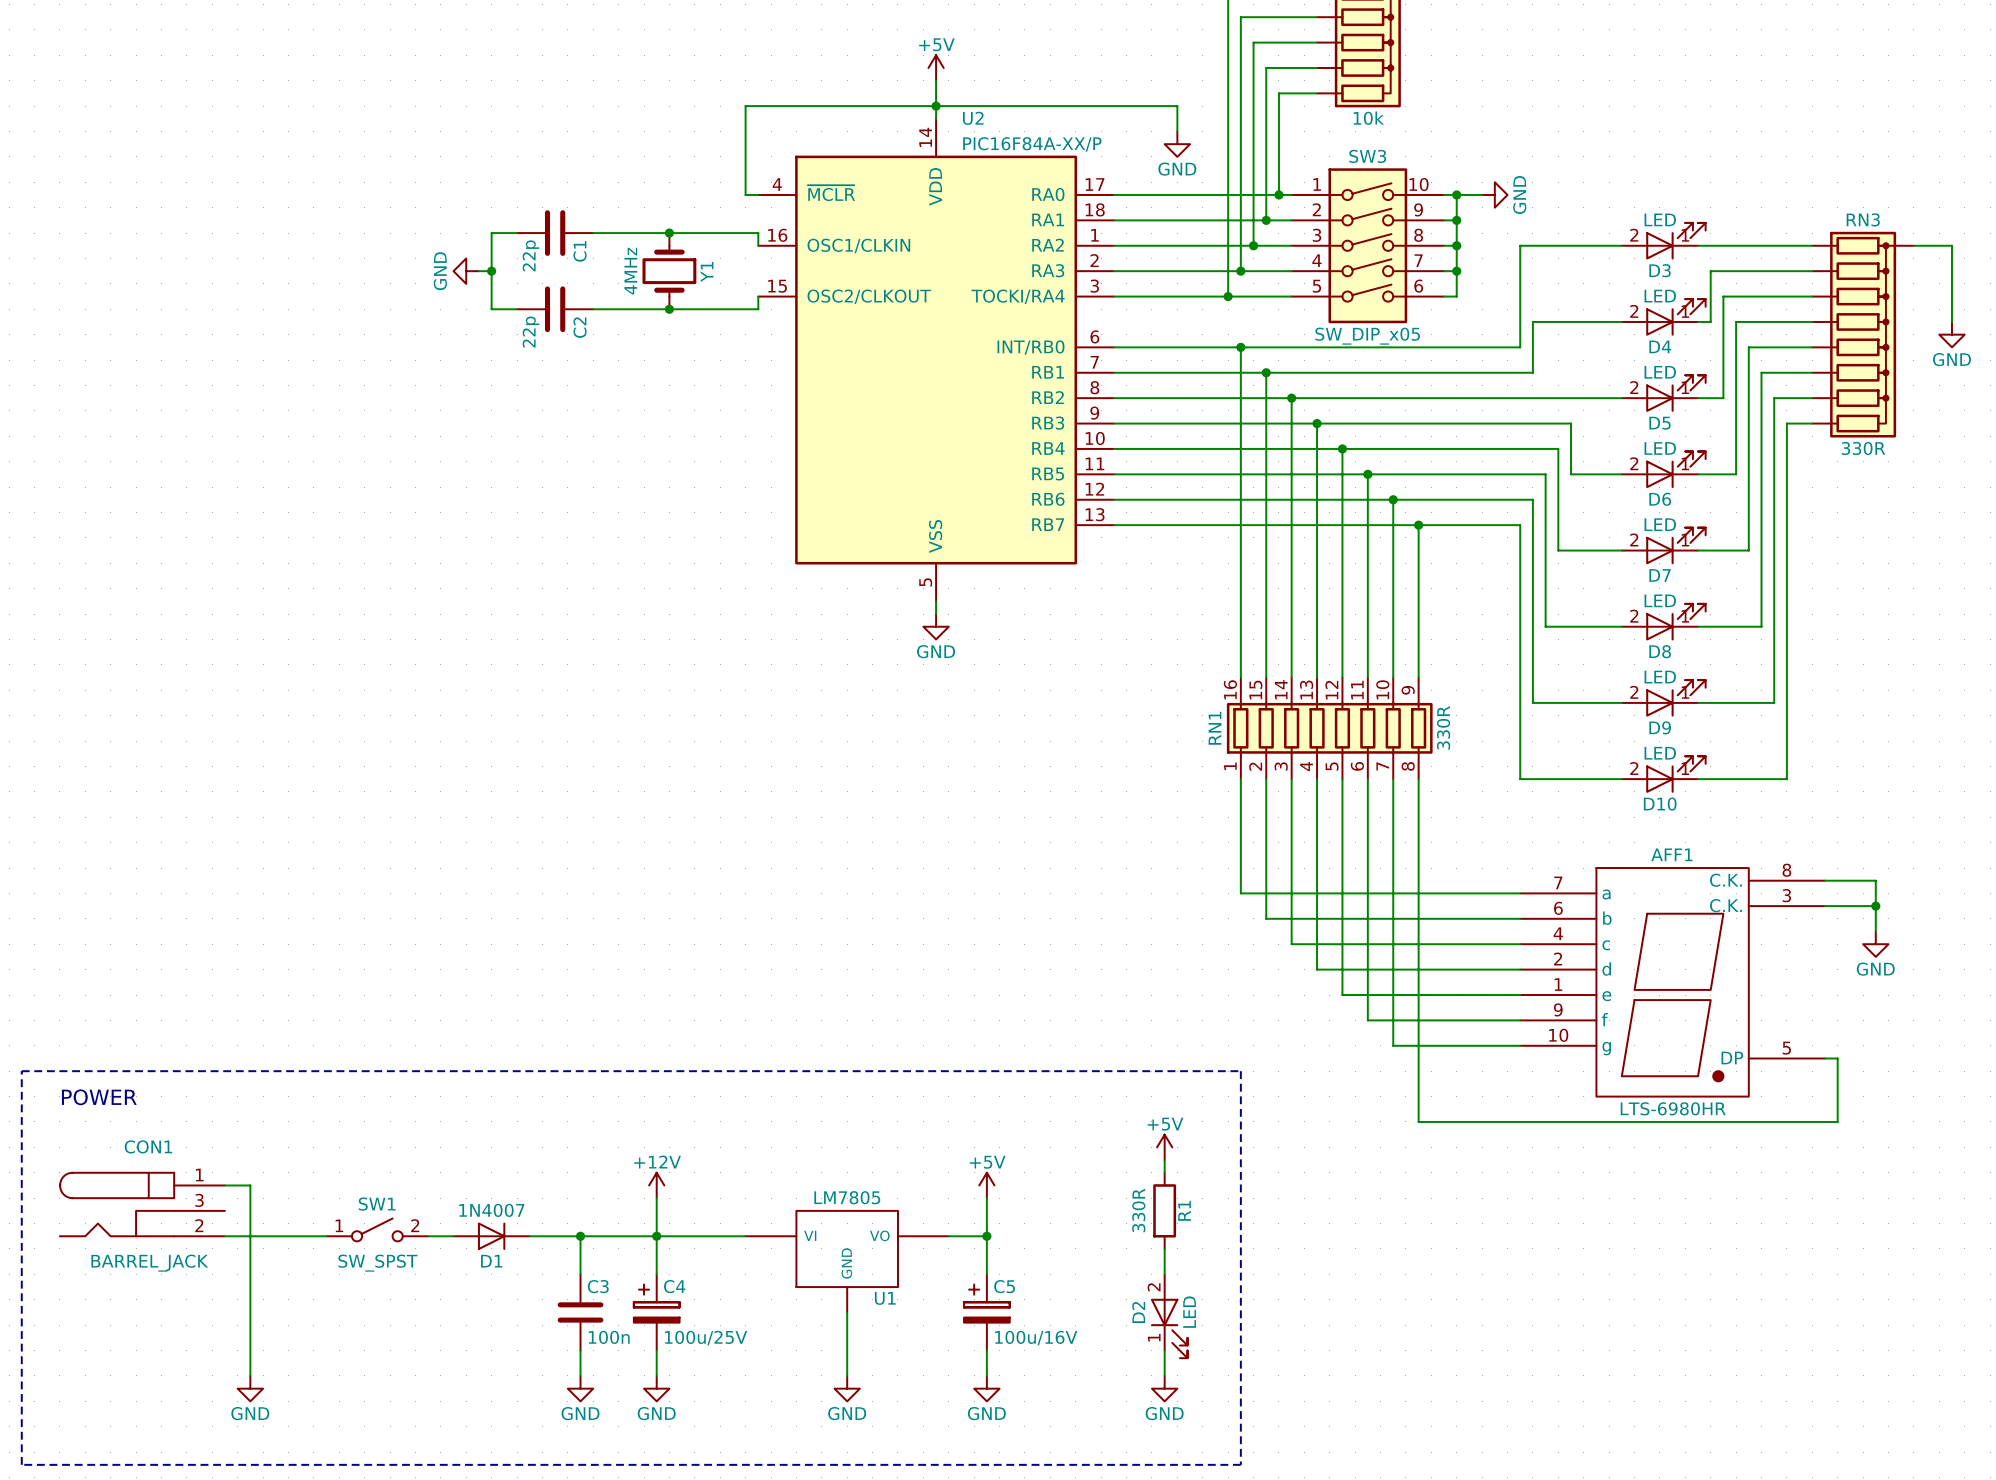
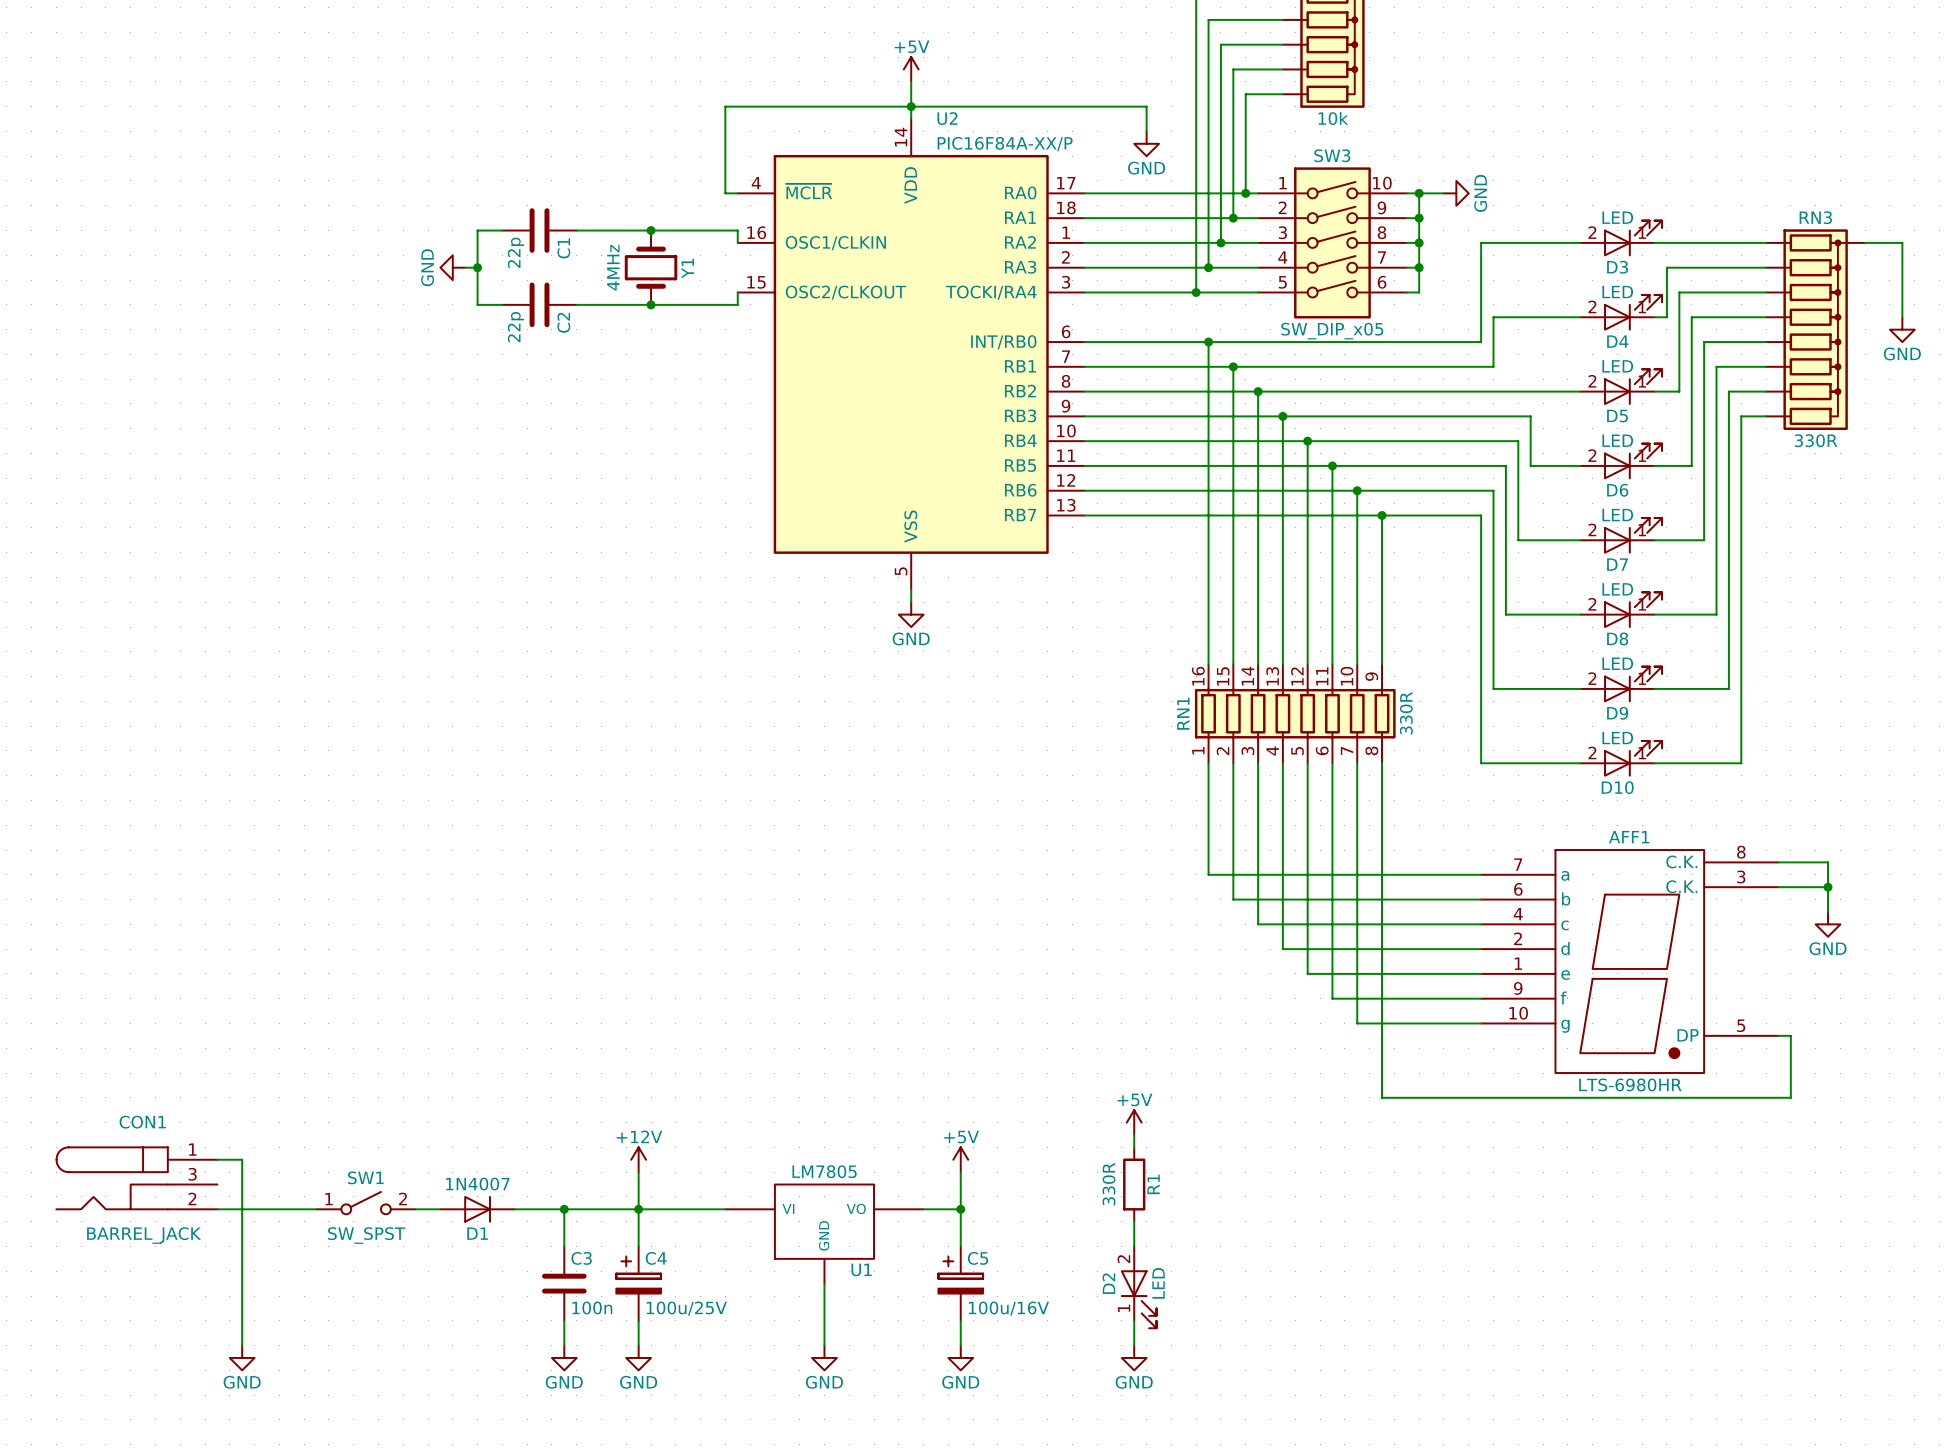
line: (21, 1071) (21, 1464) (1240, 1464) (1240, 1071) (21, 1071) -> none
text: POWER (99, 1097) -> none

